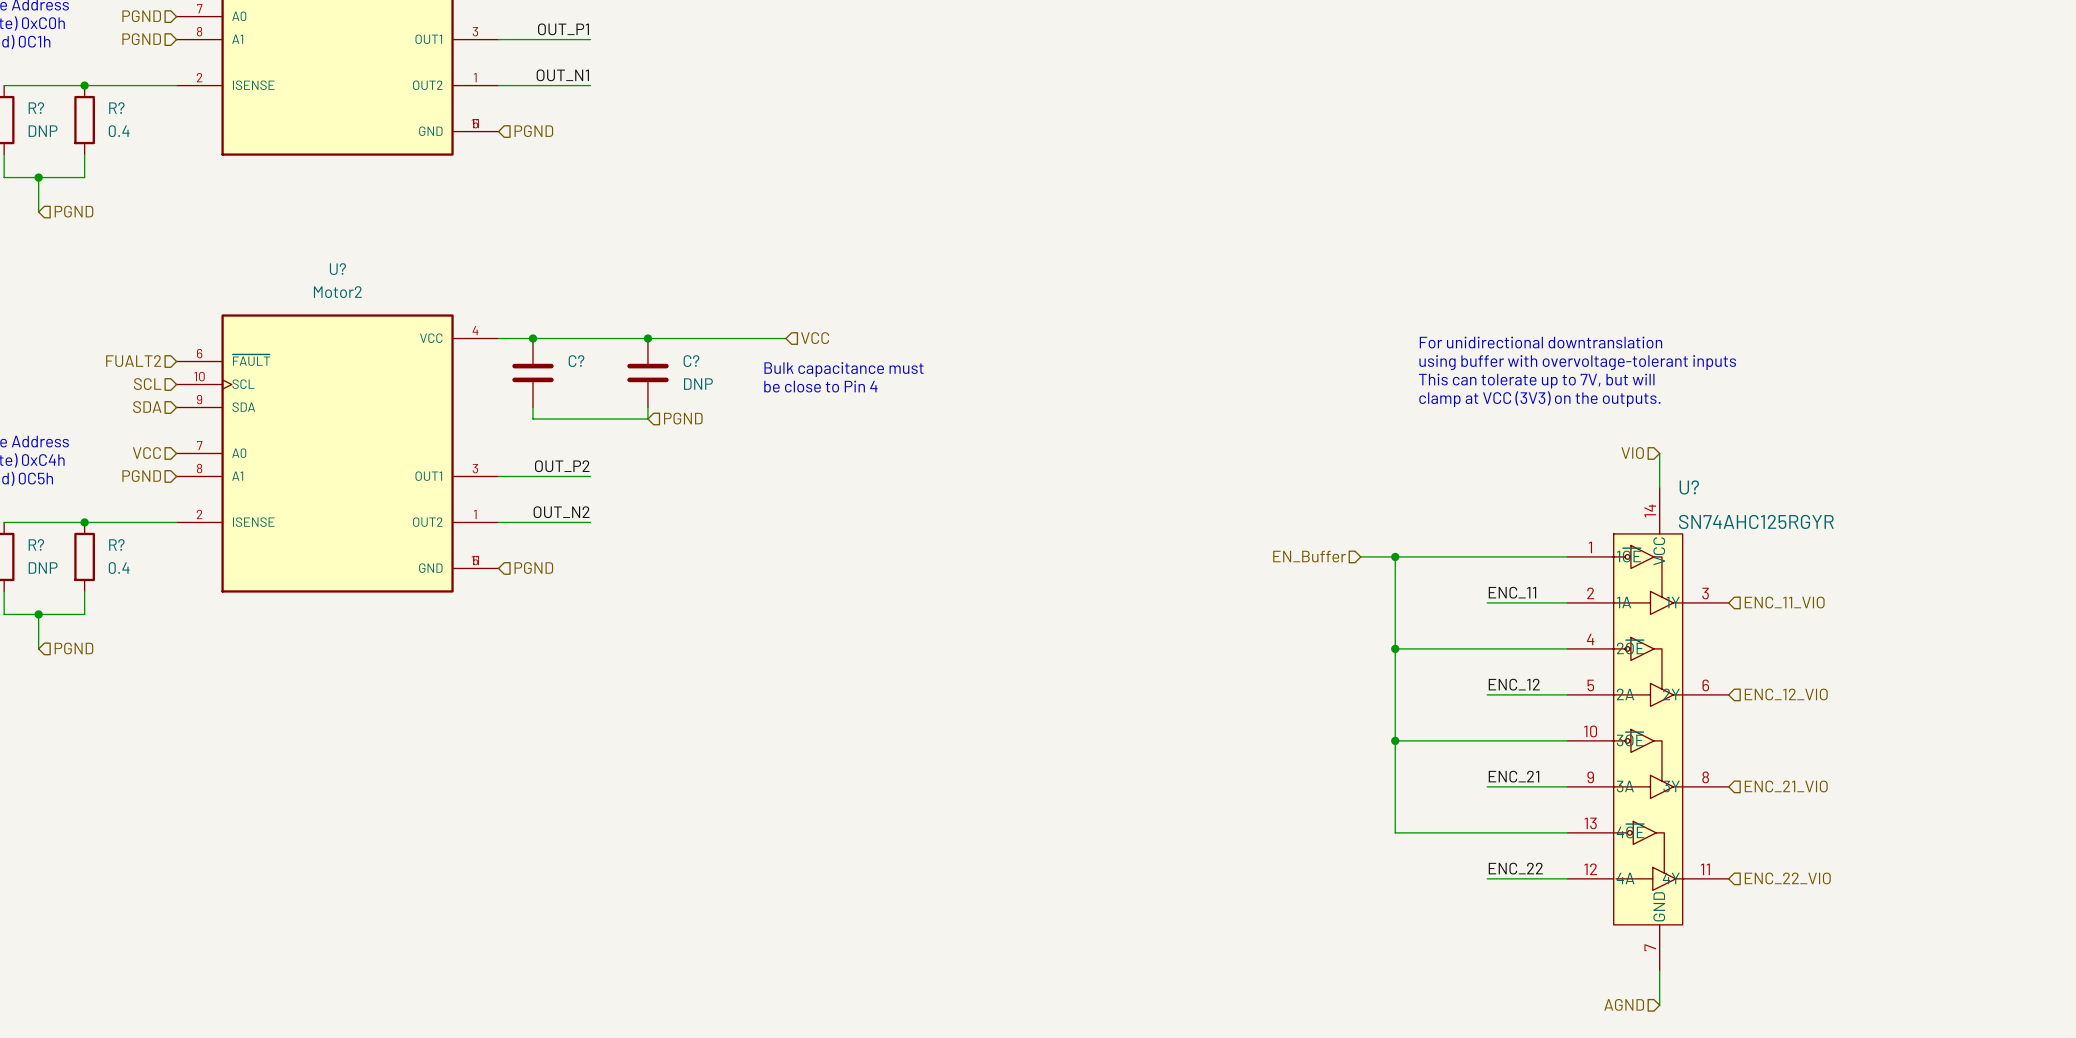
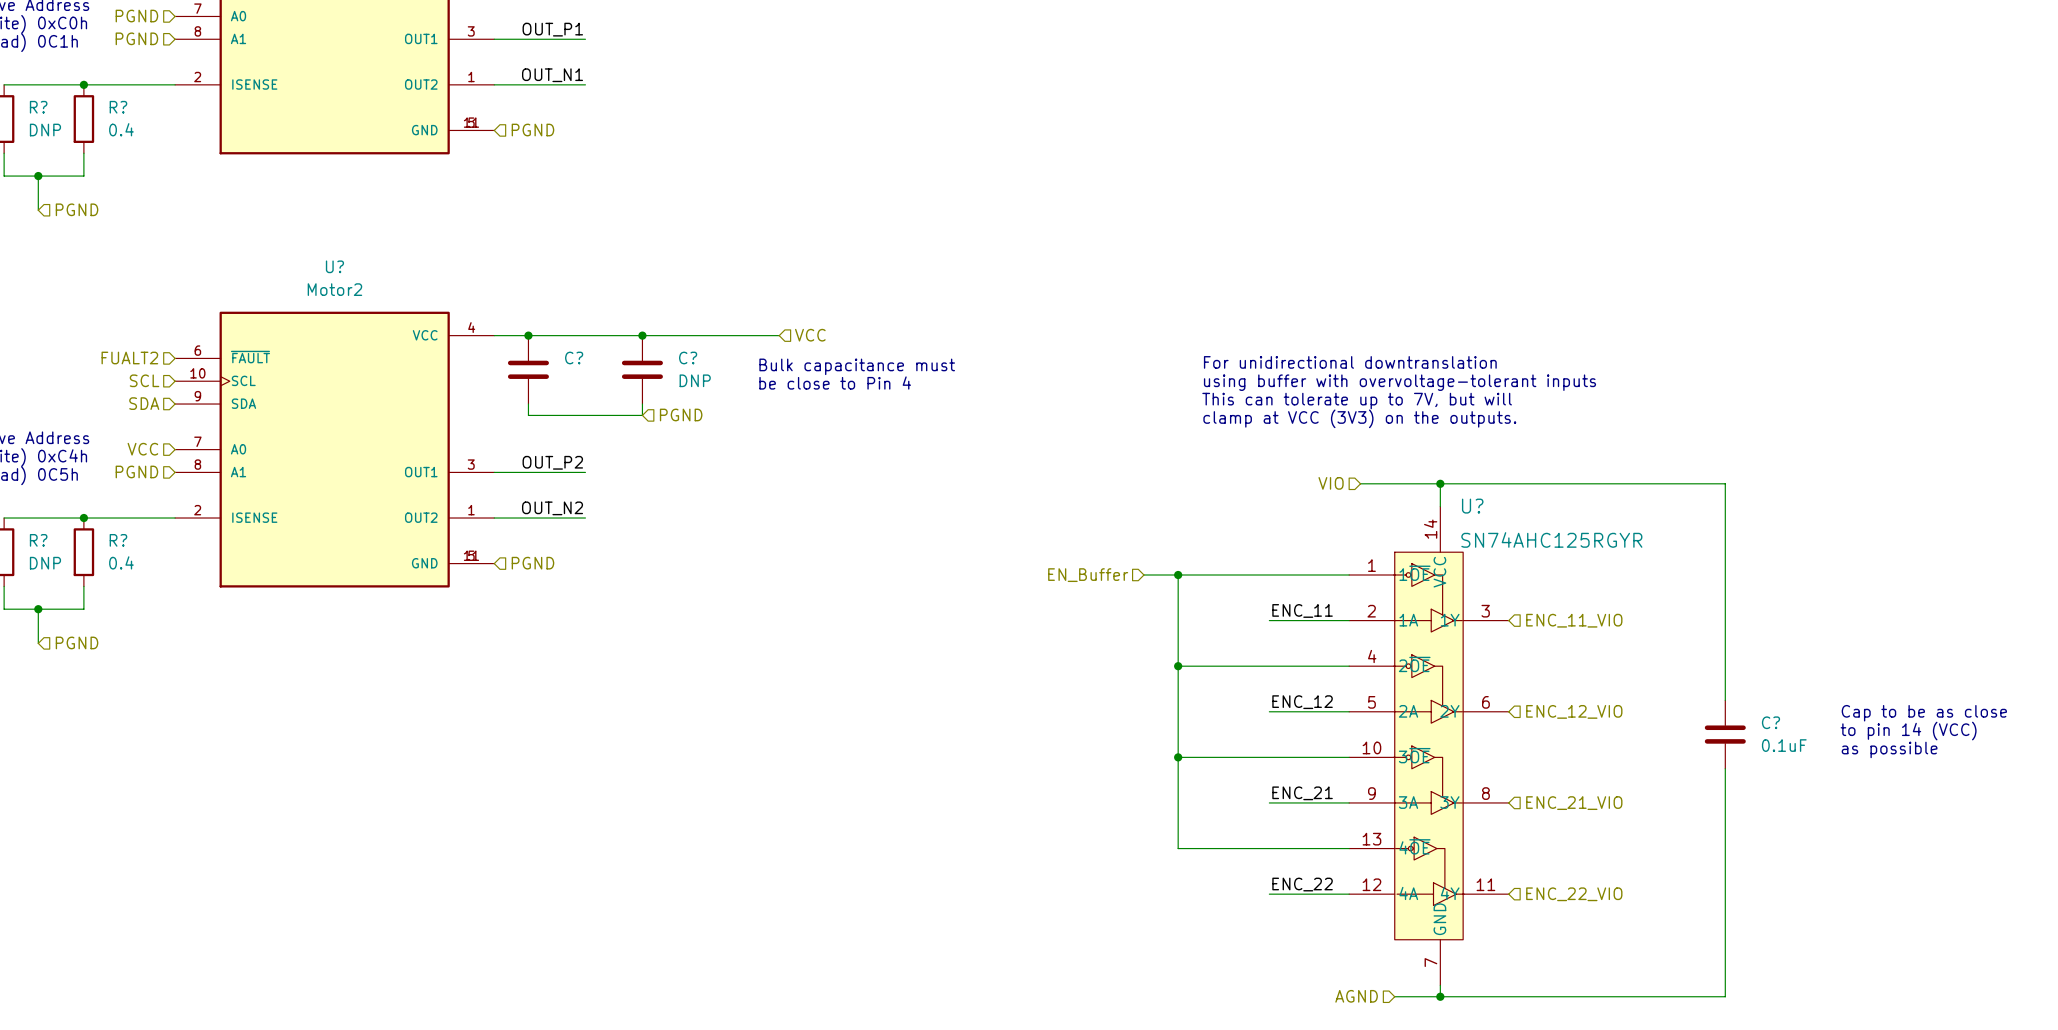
text position: For unidirectional downtranslation (1540, 342) -> For unidirectional downtranslation (1350, 362)
text position: using buffer with overvoltage-tolerant inputs (1577, 362) -> using buffer with overvoltage-tolerant inputs (1399, 382)
text position: This can tolerate up to 7V, but will (1536, 381) -> This can tolerate up to 7V, but will (1357, 401)
text position: clamp at VCC (3V3) on the outputs. (1539, 399) -> clamp at VCC (3V3) on the outputs. (1359, 418)
hierarchical label: VIO (1632, 453) -> none
wire: (1659, 453) (1659, 487) -> none
hierarchical label: none -> VIO (1331, 483)
wire: none -> (1360, 483) (1725, 483) (1725, 700)
wire: none -> (1440, 483) (1440, 506)
junction: none -> (1440, 483)
hierarchical label position: EN_Buffer (1309, 556) -> EN_Buffer (1088, 575)
wire: (1360, 556) (1567, 556) -> (1143, 575) (1349, 575)
wire: (1395, 556) (1395, 832) (1567, 832) -> (1178, 575) (1178, 848) (1349, 848)
junction: (1395, 556) -> none
junction: none -> (1178, 575)
label position: ENC_11 (1512, 592) -> ENC_11 (1302, 610)
wire: (1487, 602) (1567, 602) -> (1269, 620) (1349, 620)
hierarchical label position: ENC_11_VIO (1784, 602) -> ENC_11_VIO (1574, 620)
wire: (1395, 648) (1567, 648) -> (1178, 666) (1349, 666)
junction: (1395, 648) -> none
junction: none -> (1178, 666)
label position: ENC_12 (1514, 684) -> ENC_12 (1302, 702)
wire: (1487, 694) (1567, 694) -> (1269, 711) (1349, 711)
hierarchical label position: ENC_12_VIO (1786, 694) -> ENC_12_VIO (1574, 711)
text: none -> Cap to be as close (1924, 713)
U? position: (1648, 729) -> (1428, 745)
text: none -> to pin 14 (VCC) (1908, 731)
wire: (1395, 740) (1567, 740) -> (1178, 757) (1349, 757)
junction: (1395, 740) -> none
C?: none -> 0.1uF (1725, 734)
text: none -> as possible (1889, 749)
junction: none -> (1178, 757)
wire: none -> (1725, 768) (1725, 996) (1394, 996)
label position: ENC_21 (1513, 776) -> ENC_21 (1302, 793)
wire: (1487, 786) (1567, 786) -> (1269, 802) (1349, 802)
hierarchical label position: ENC_21_VIO (1786, 786) -> ENC_21_VIO (1574, 803)
label position: ENC_22 (1515, 868) -> ENC_22 (1302, 884)
wire: (1487, 878) (1567, 878) -> (1269, 894) (1349, 894)
hierarchical label position: ENC_22_VIO (1787, 878) -> ENC_22_VIO (1574, 894)
wire: (1659, 970) (1659, 1005) -> none
wire: none -> (1440, 985) (1440, 996)
hierarchical label: none -> AGND (1356, 996)
hierarchical label: AGND (1624, 1004) -> none
junction: none -> (1440, 996)

